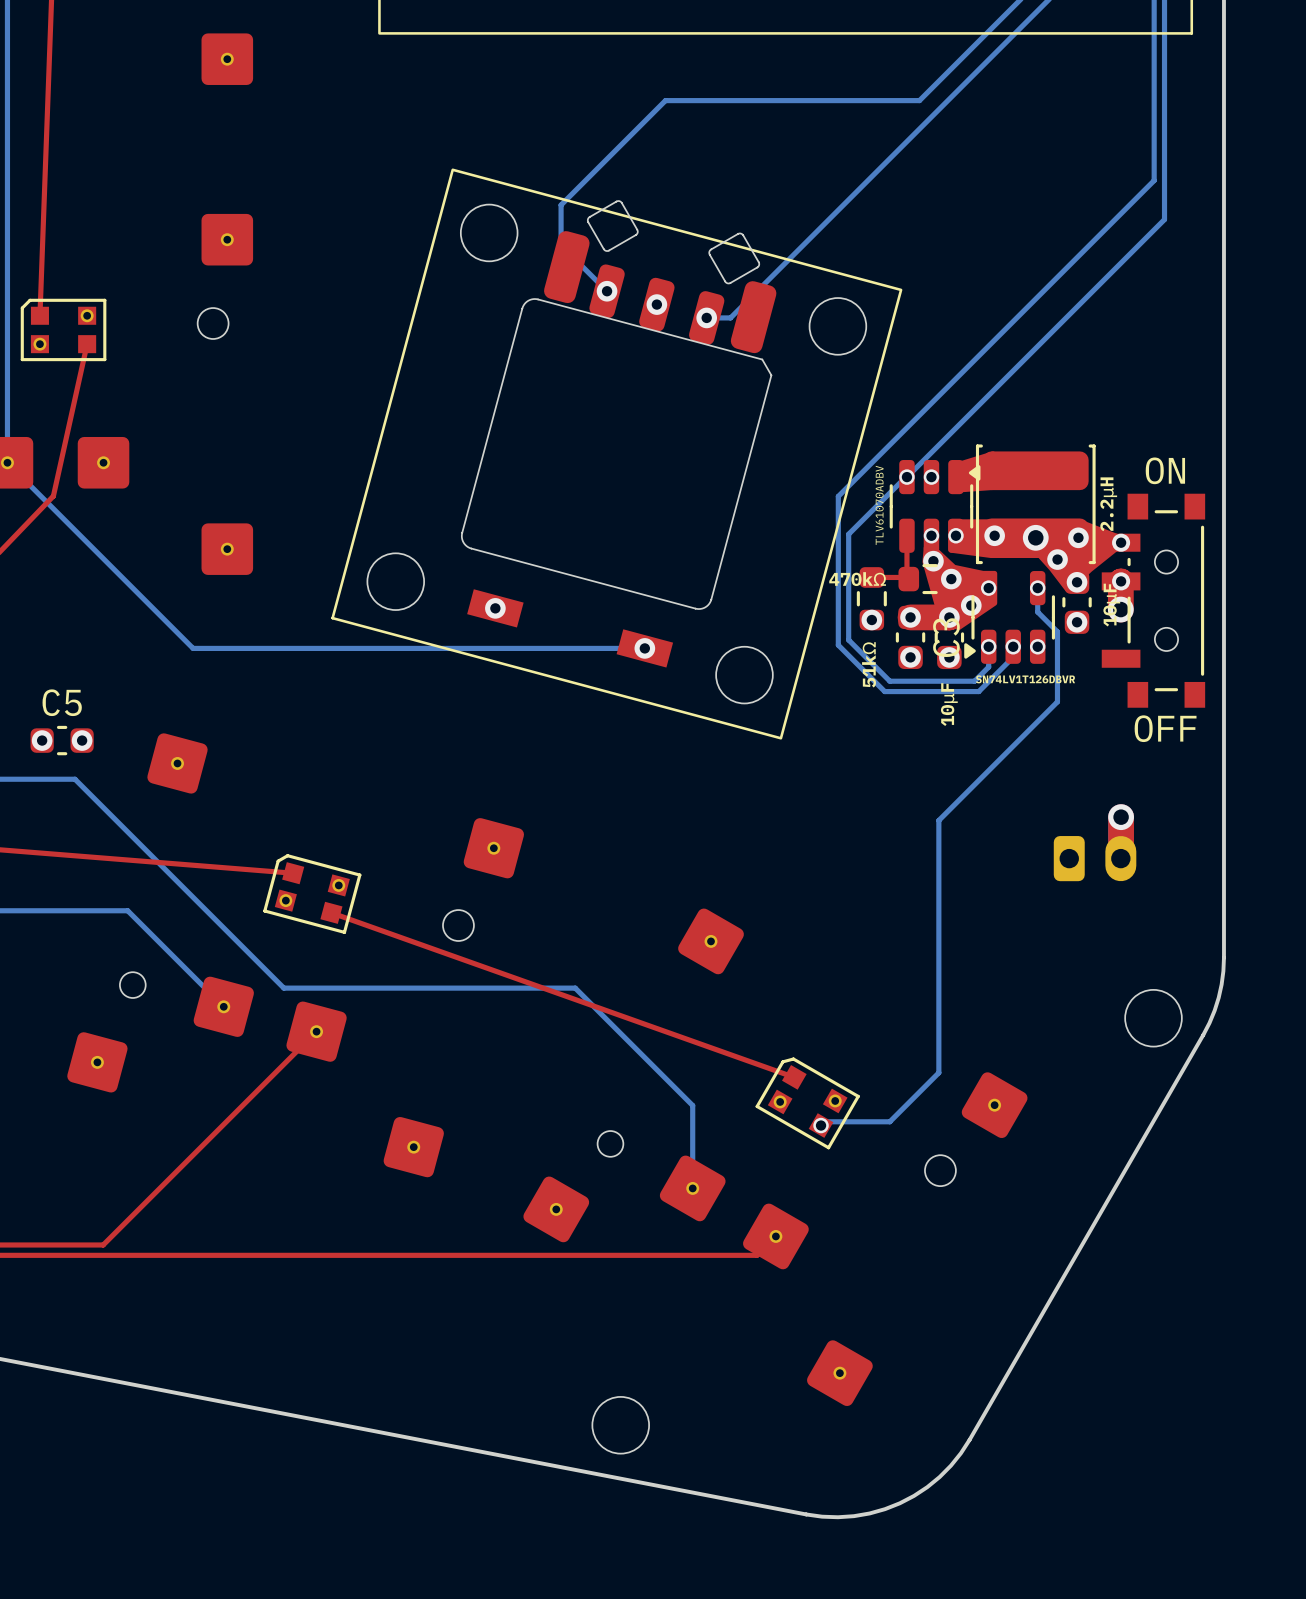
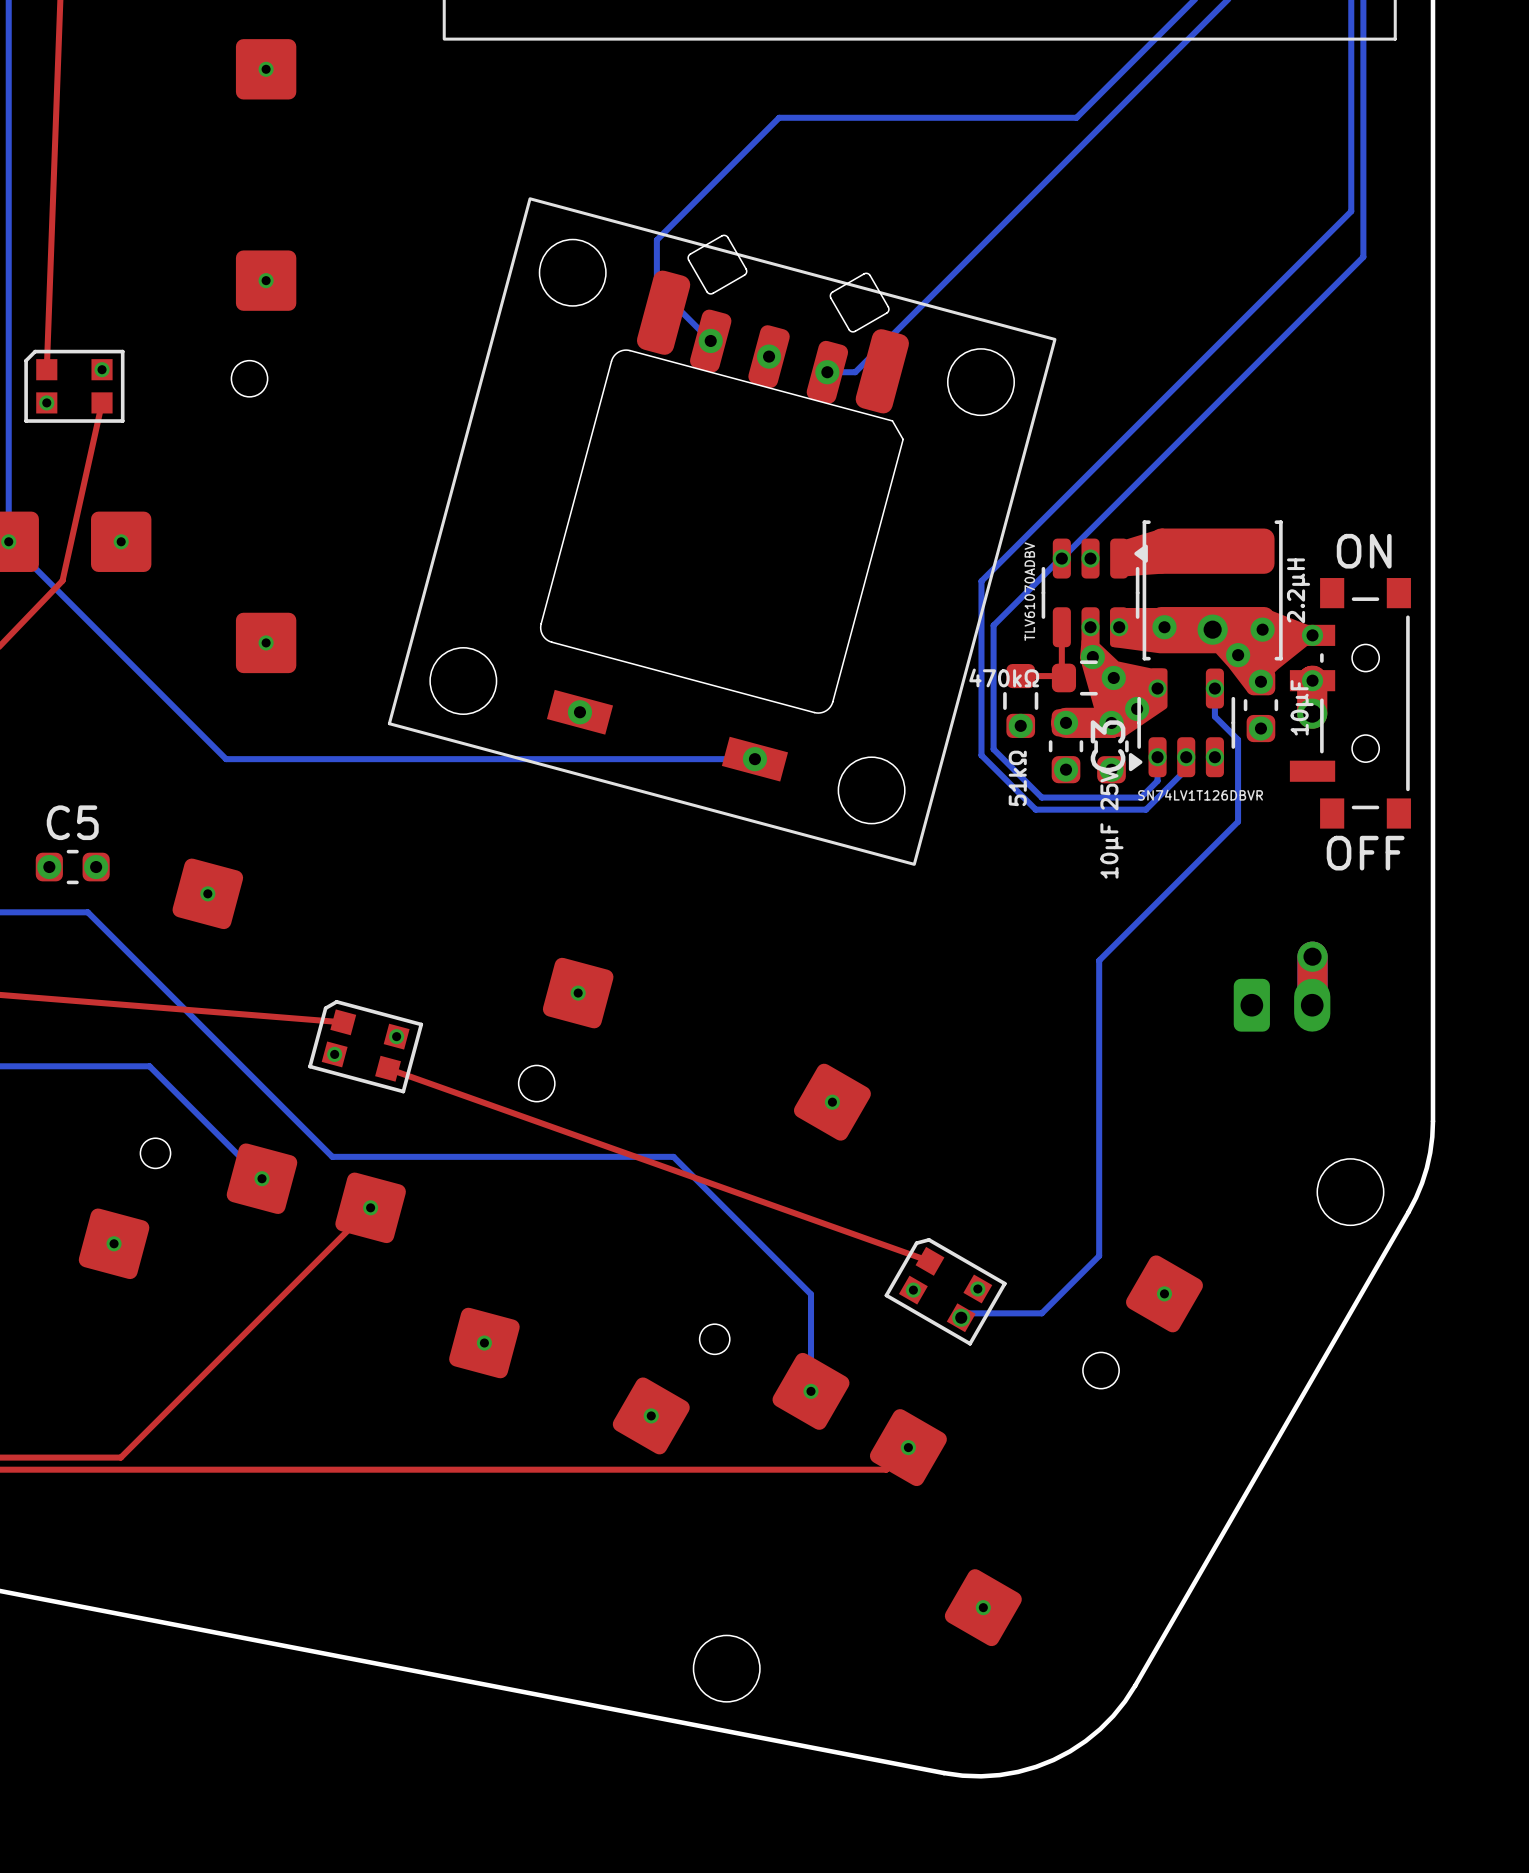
part value: 10μF (949, 704) -> 10μF 25V (1111, 823)

